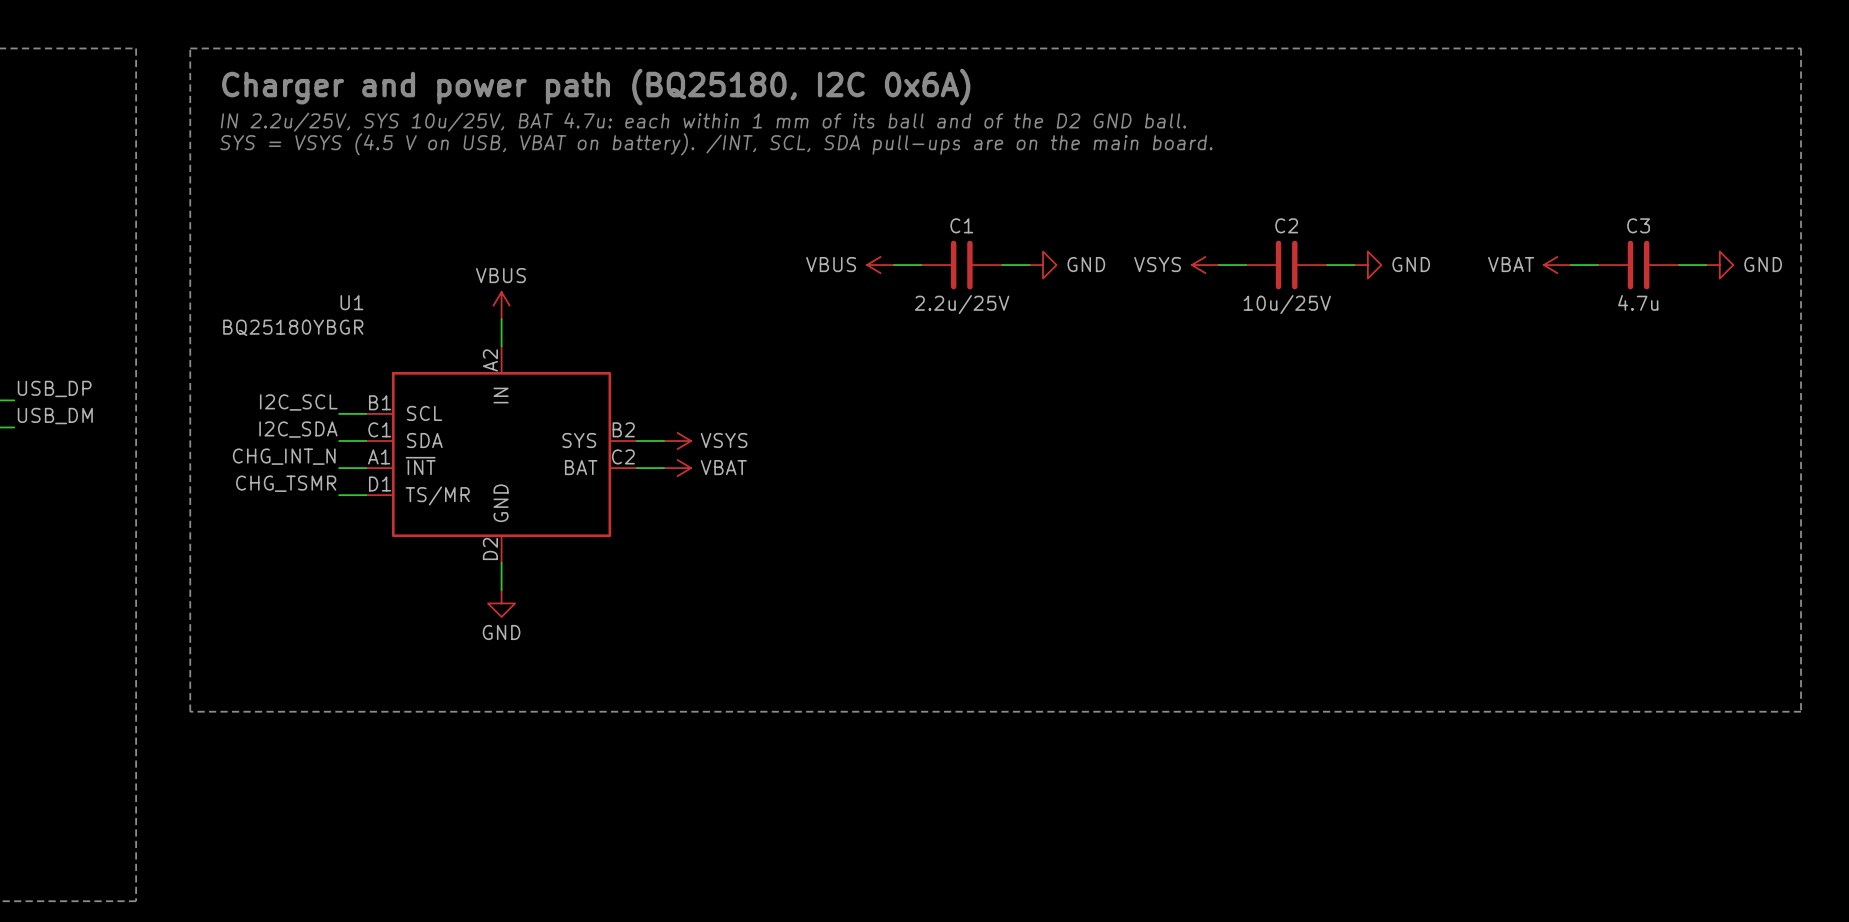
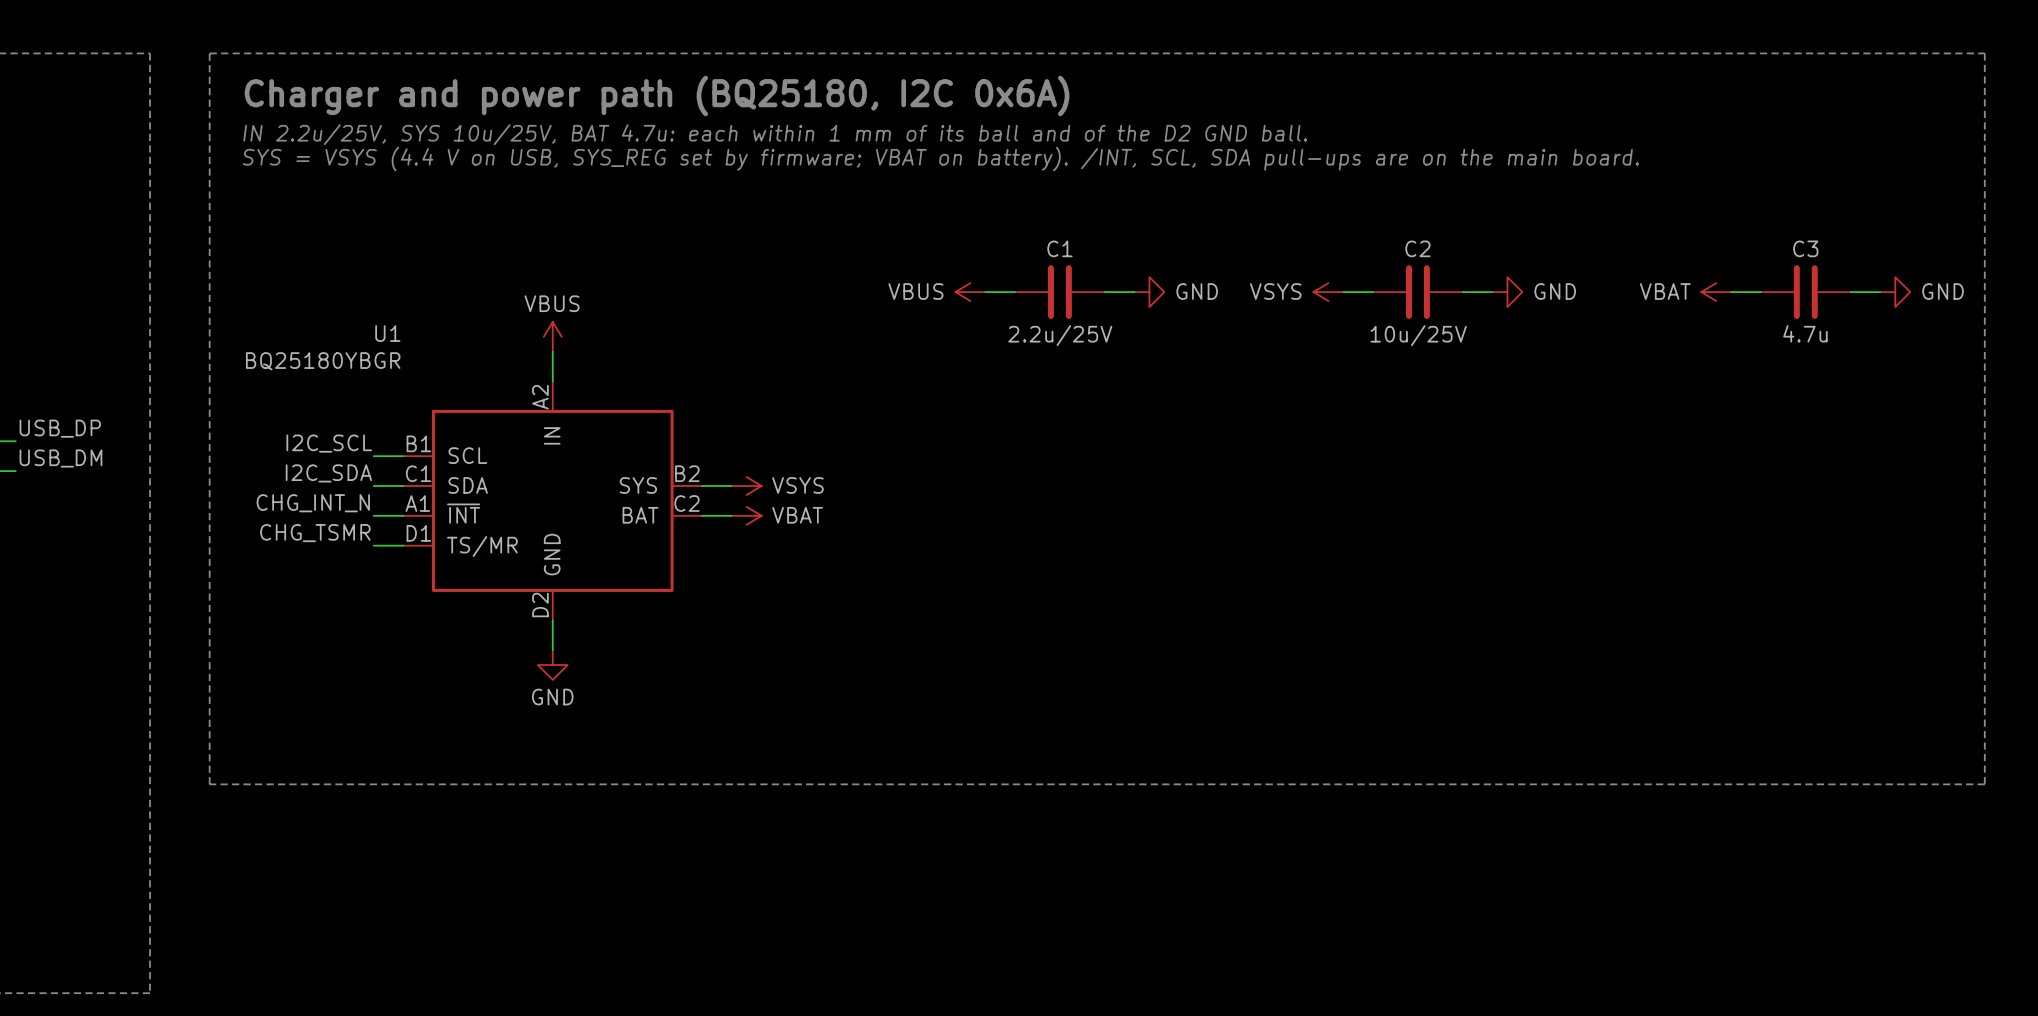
text: SYS = VSYS (4.5 V on USB, VBAT on battery). /INT, SCL, SDA pull-ups are on the main board. (716, 144) -> SYS = VSYS (4.4 V on USB, SYS_REG set by firmware; VBAT on battery). /INT, SCL, SDA pull-ups are on the main board. (940, 159)

